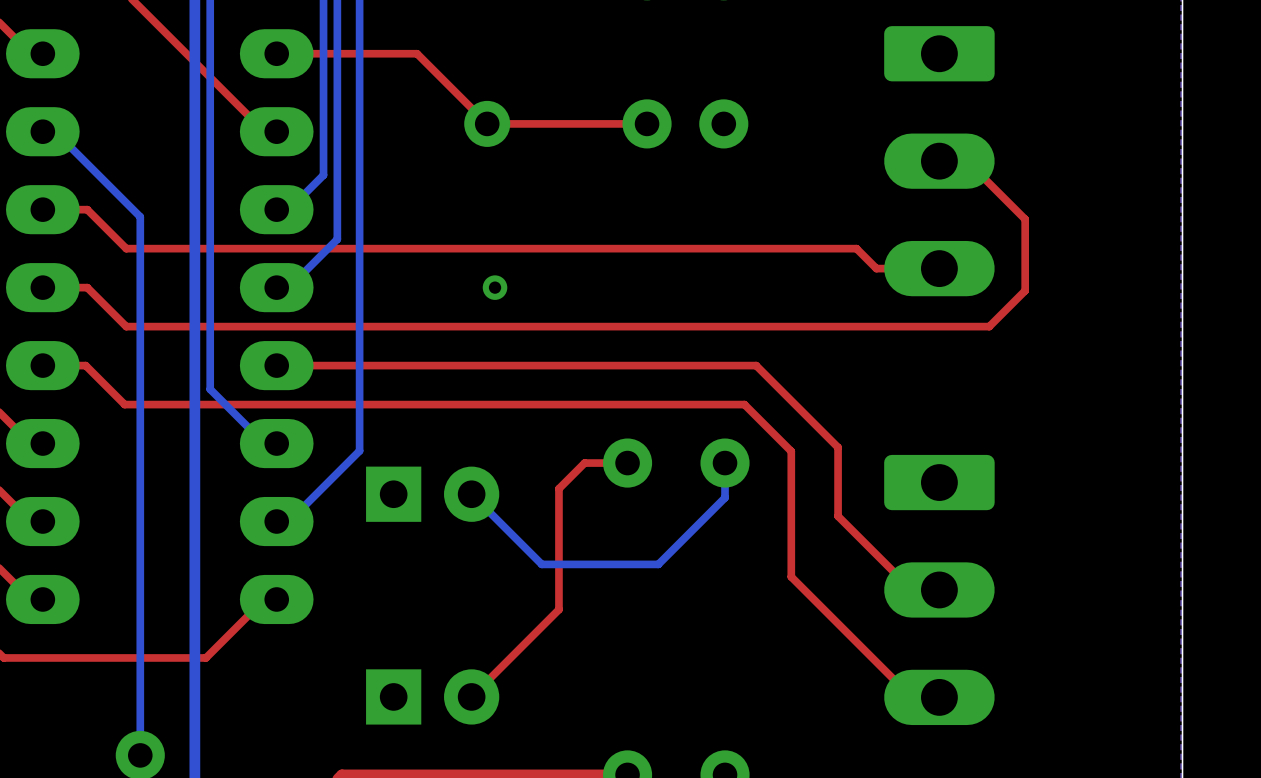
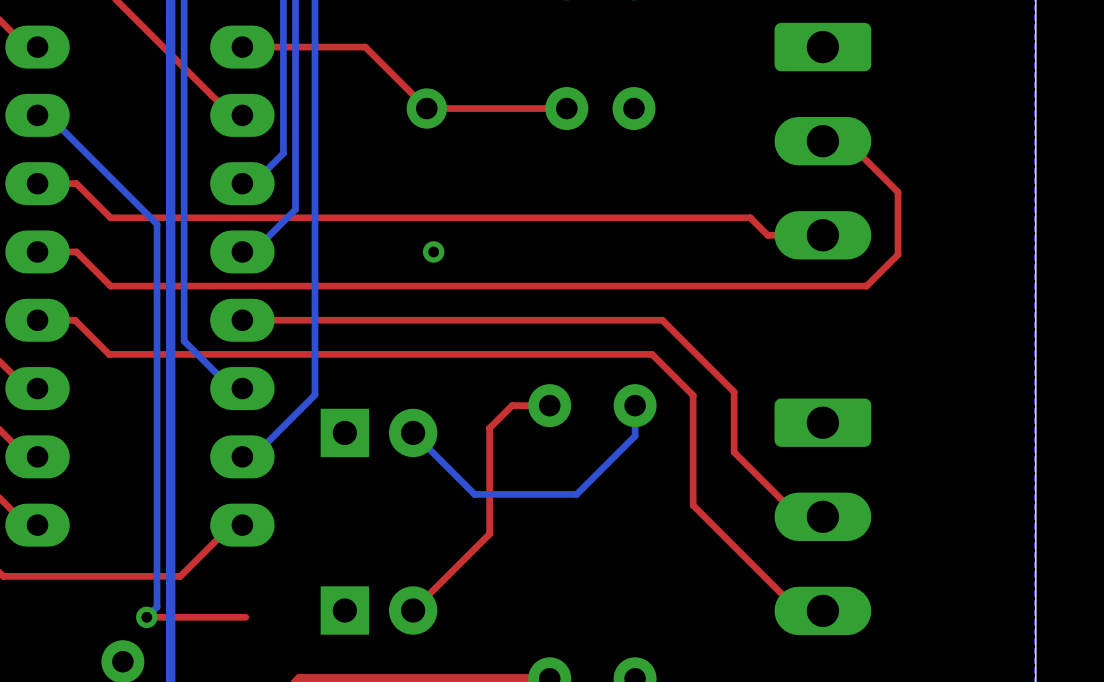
bottom track: (140, 216) (140, 755) -> (122, 189) (157, 224) (157, 607) (146, 617)
via: none -> (146, 617)
top track: none -> (245, 617) (146, 617)

